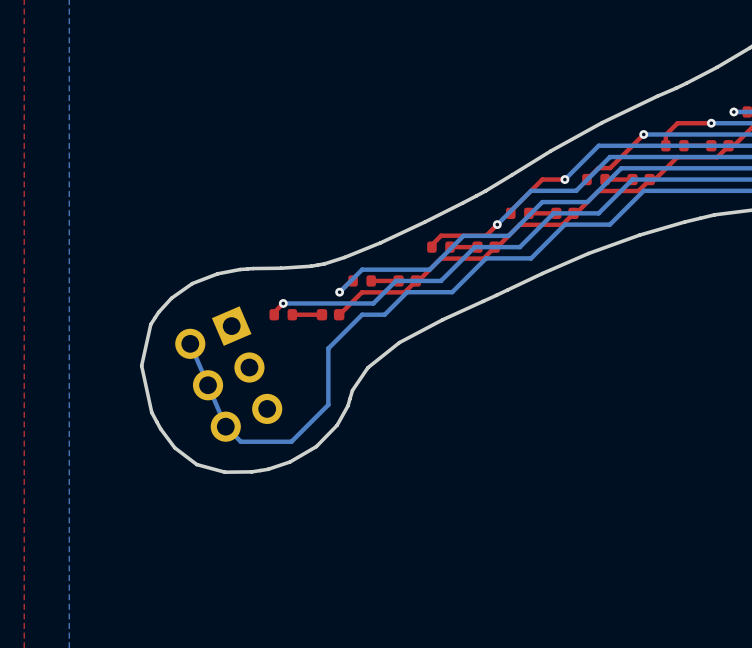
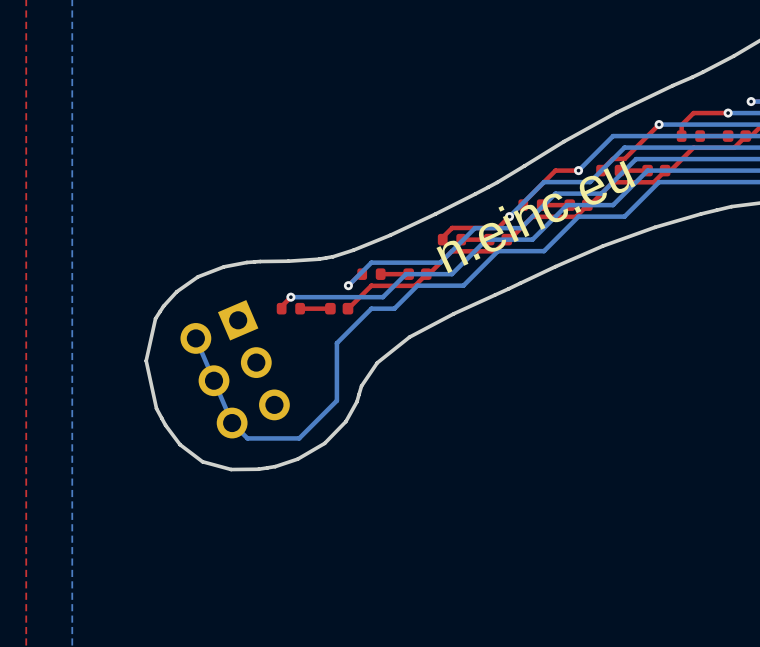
text: none -> n.einc.eu (536, 216)

